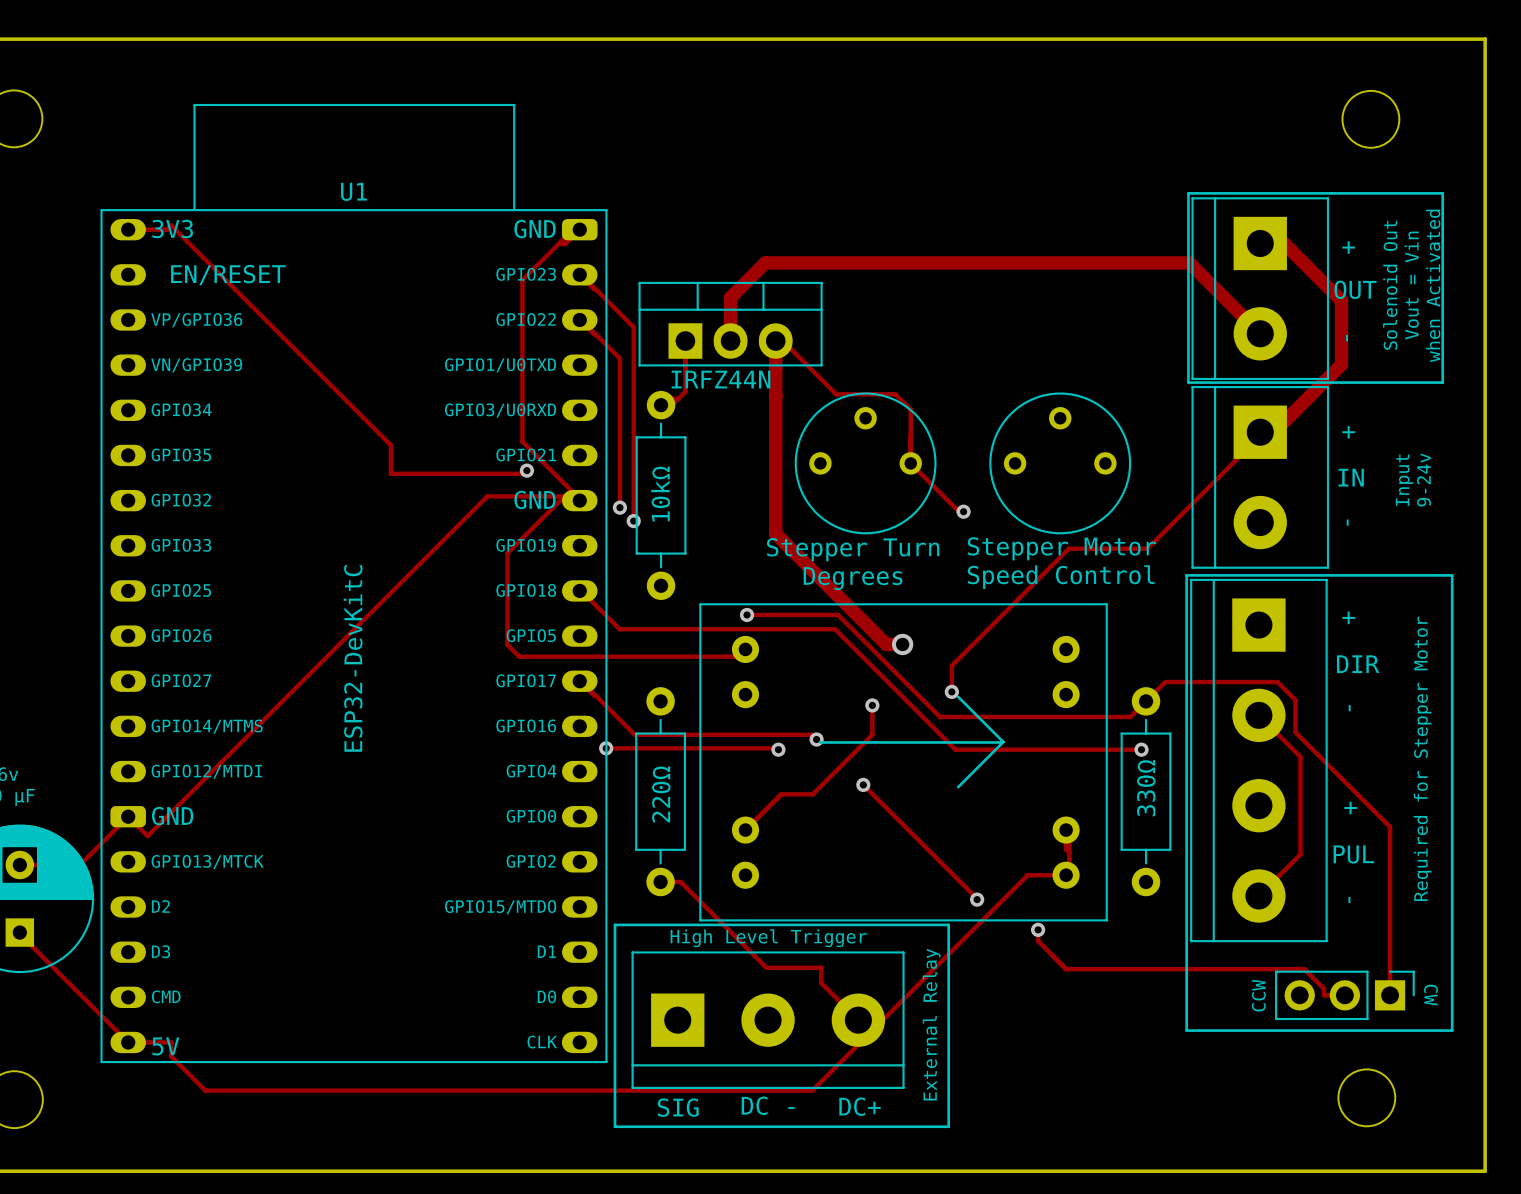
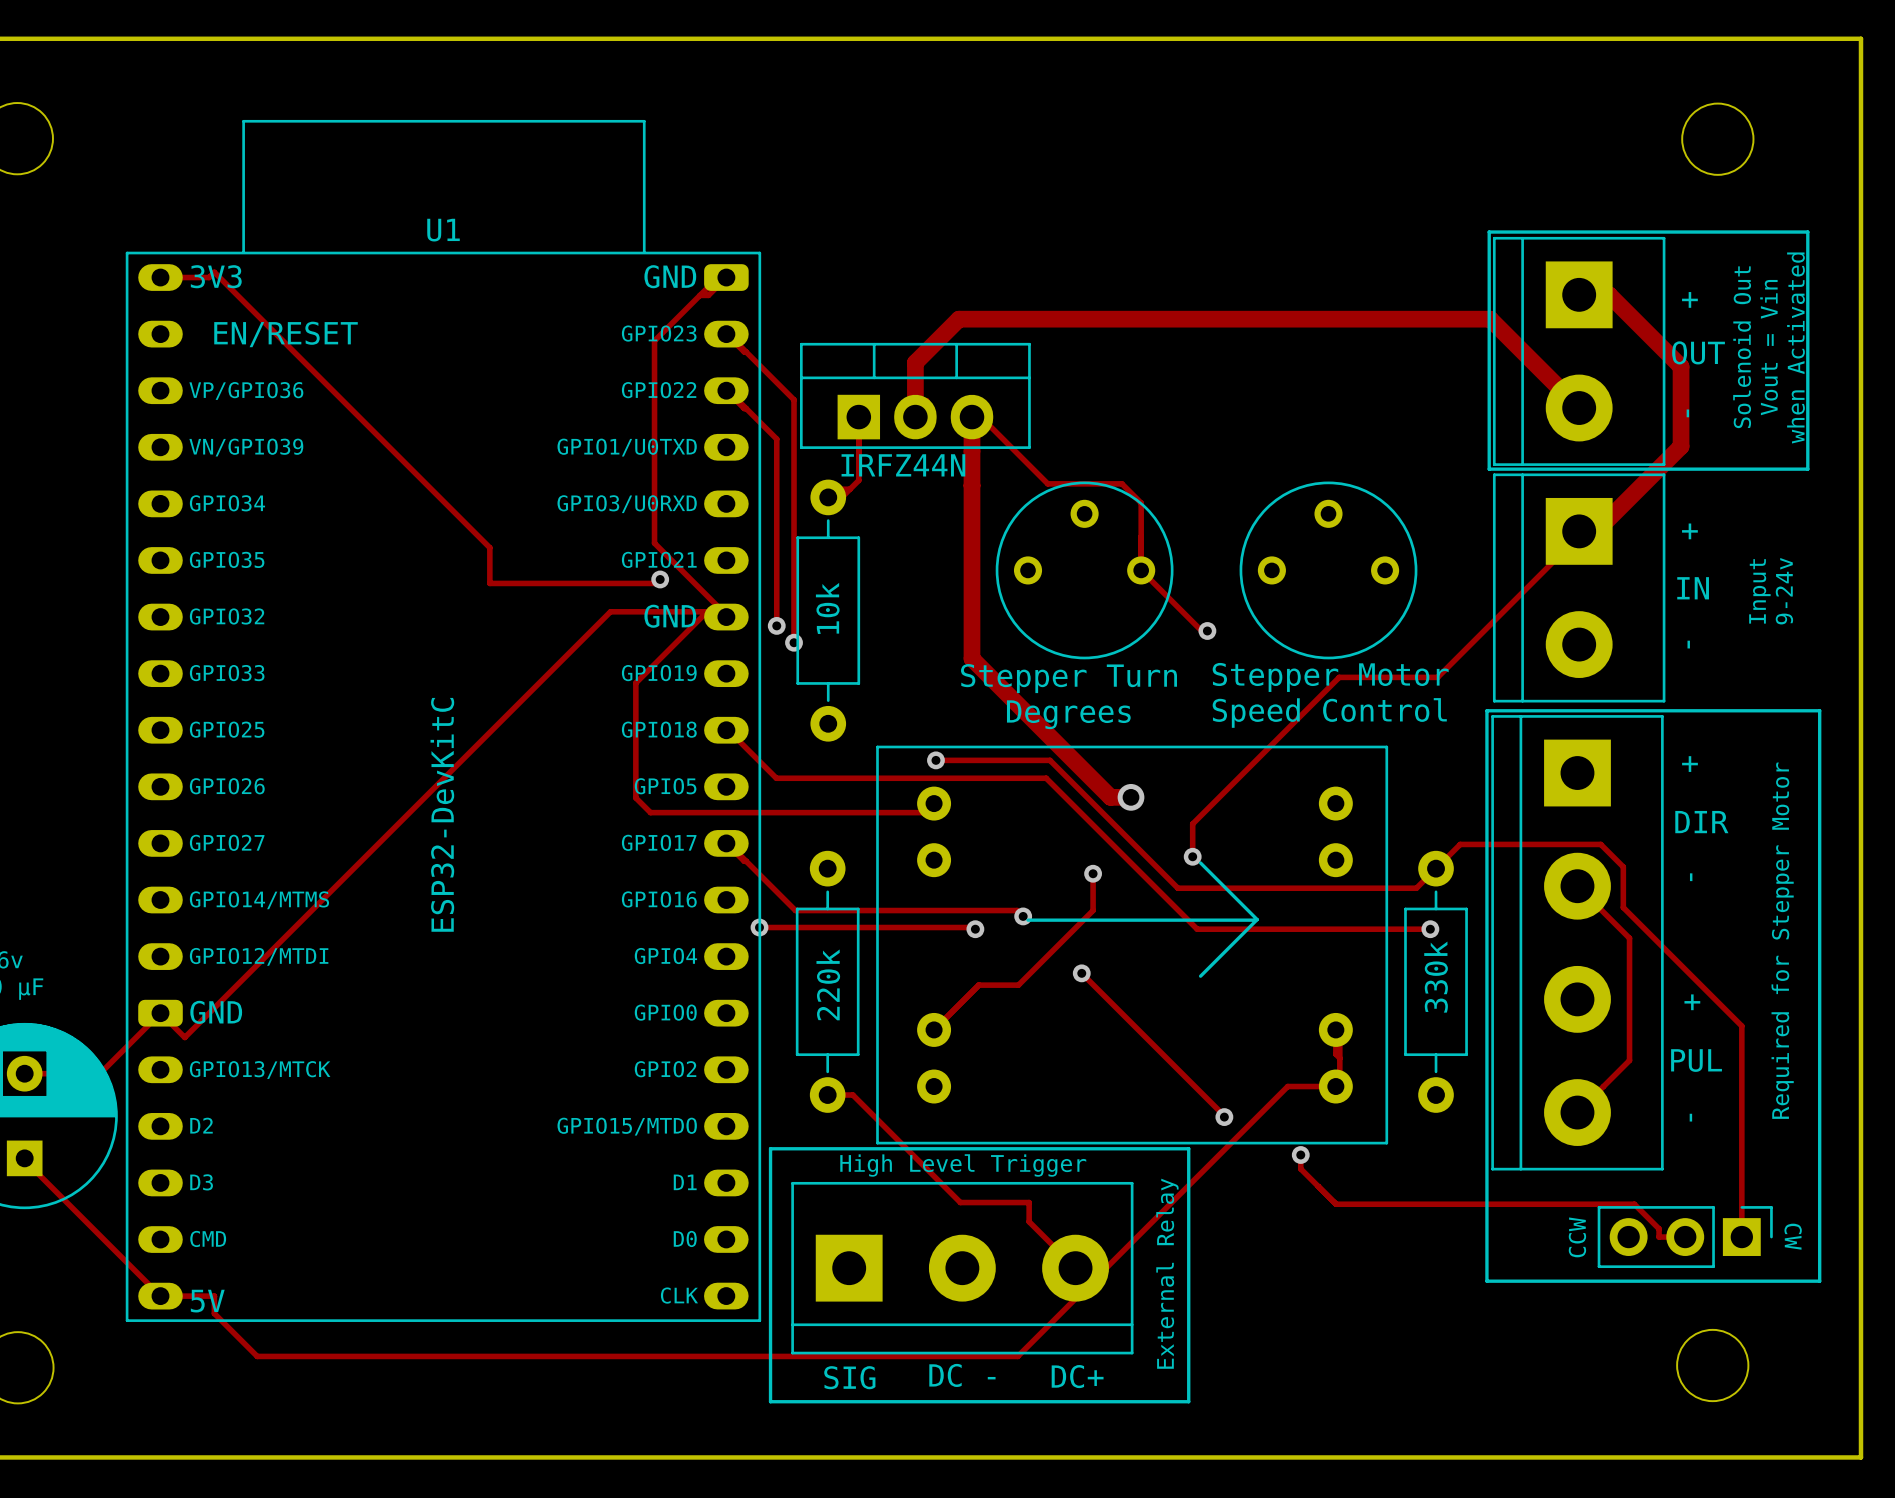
part value: 10kΩ (660, 493) -> 10k (827, 608)
part value: 330Ω (1146, 788) -> 330k (1436, 977)
part value: 220Ω (661, 794) -> 220k (828, 984)

